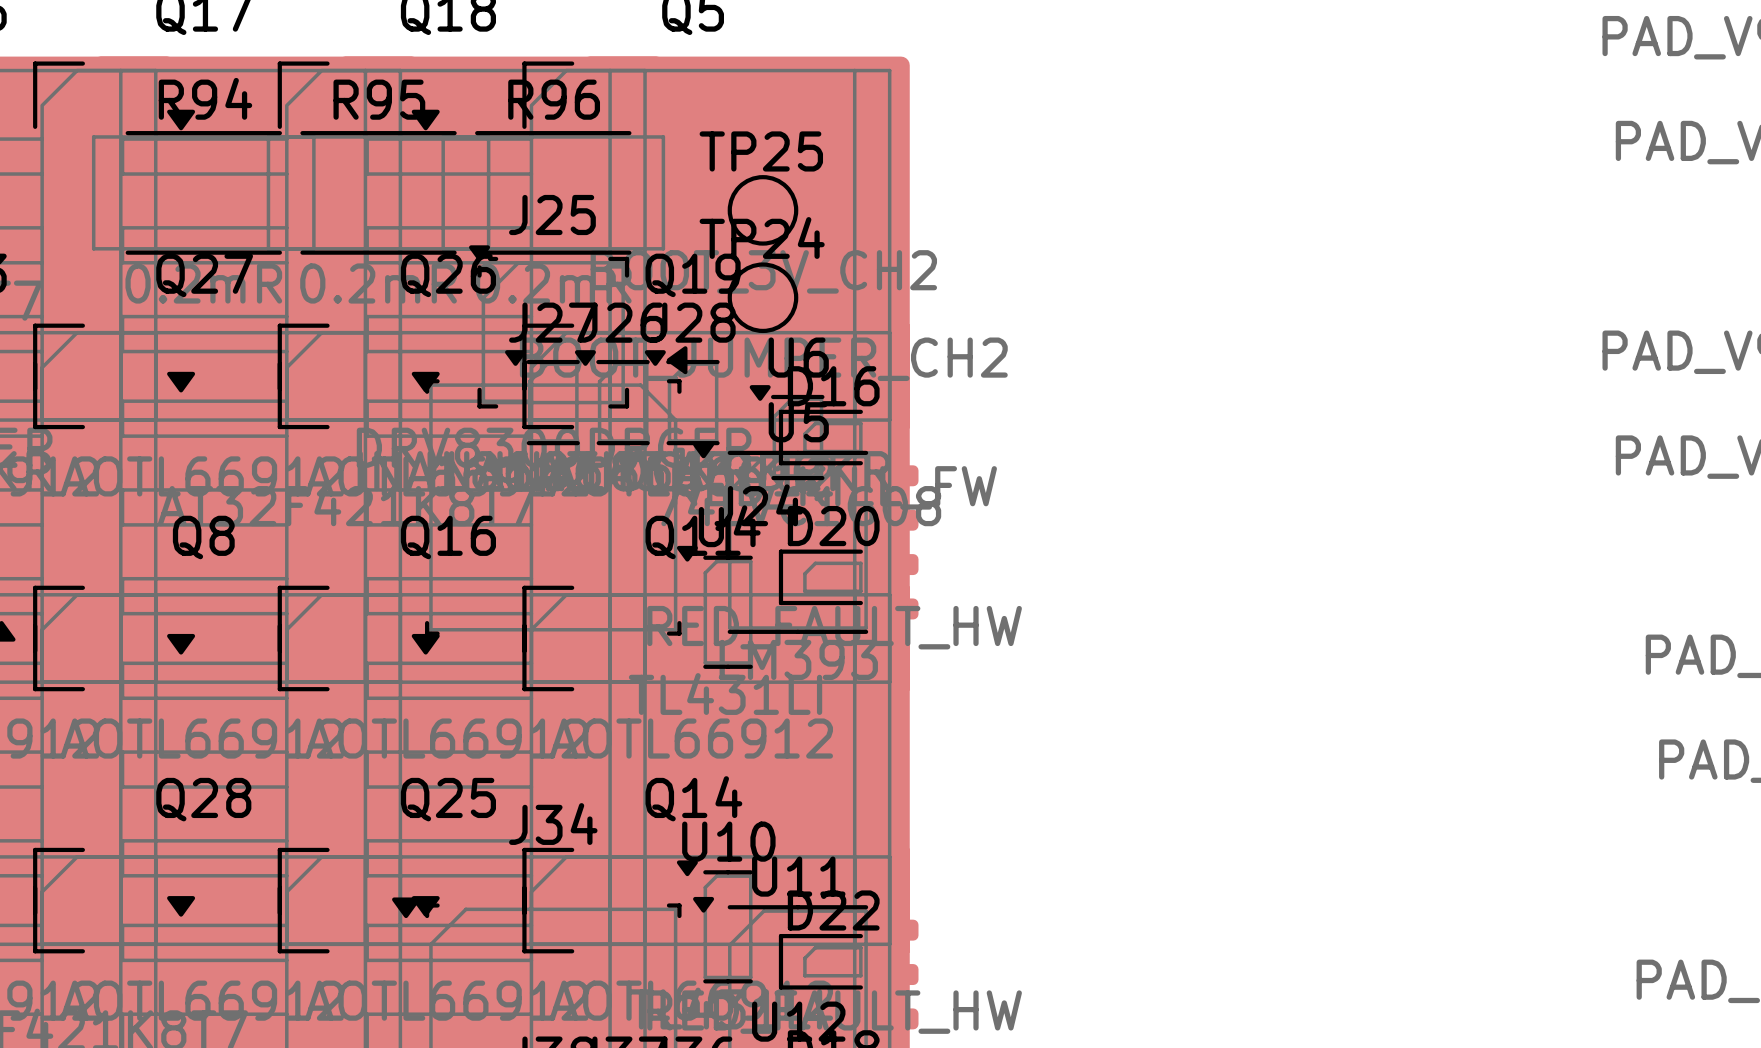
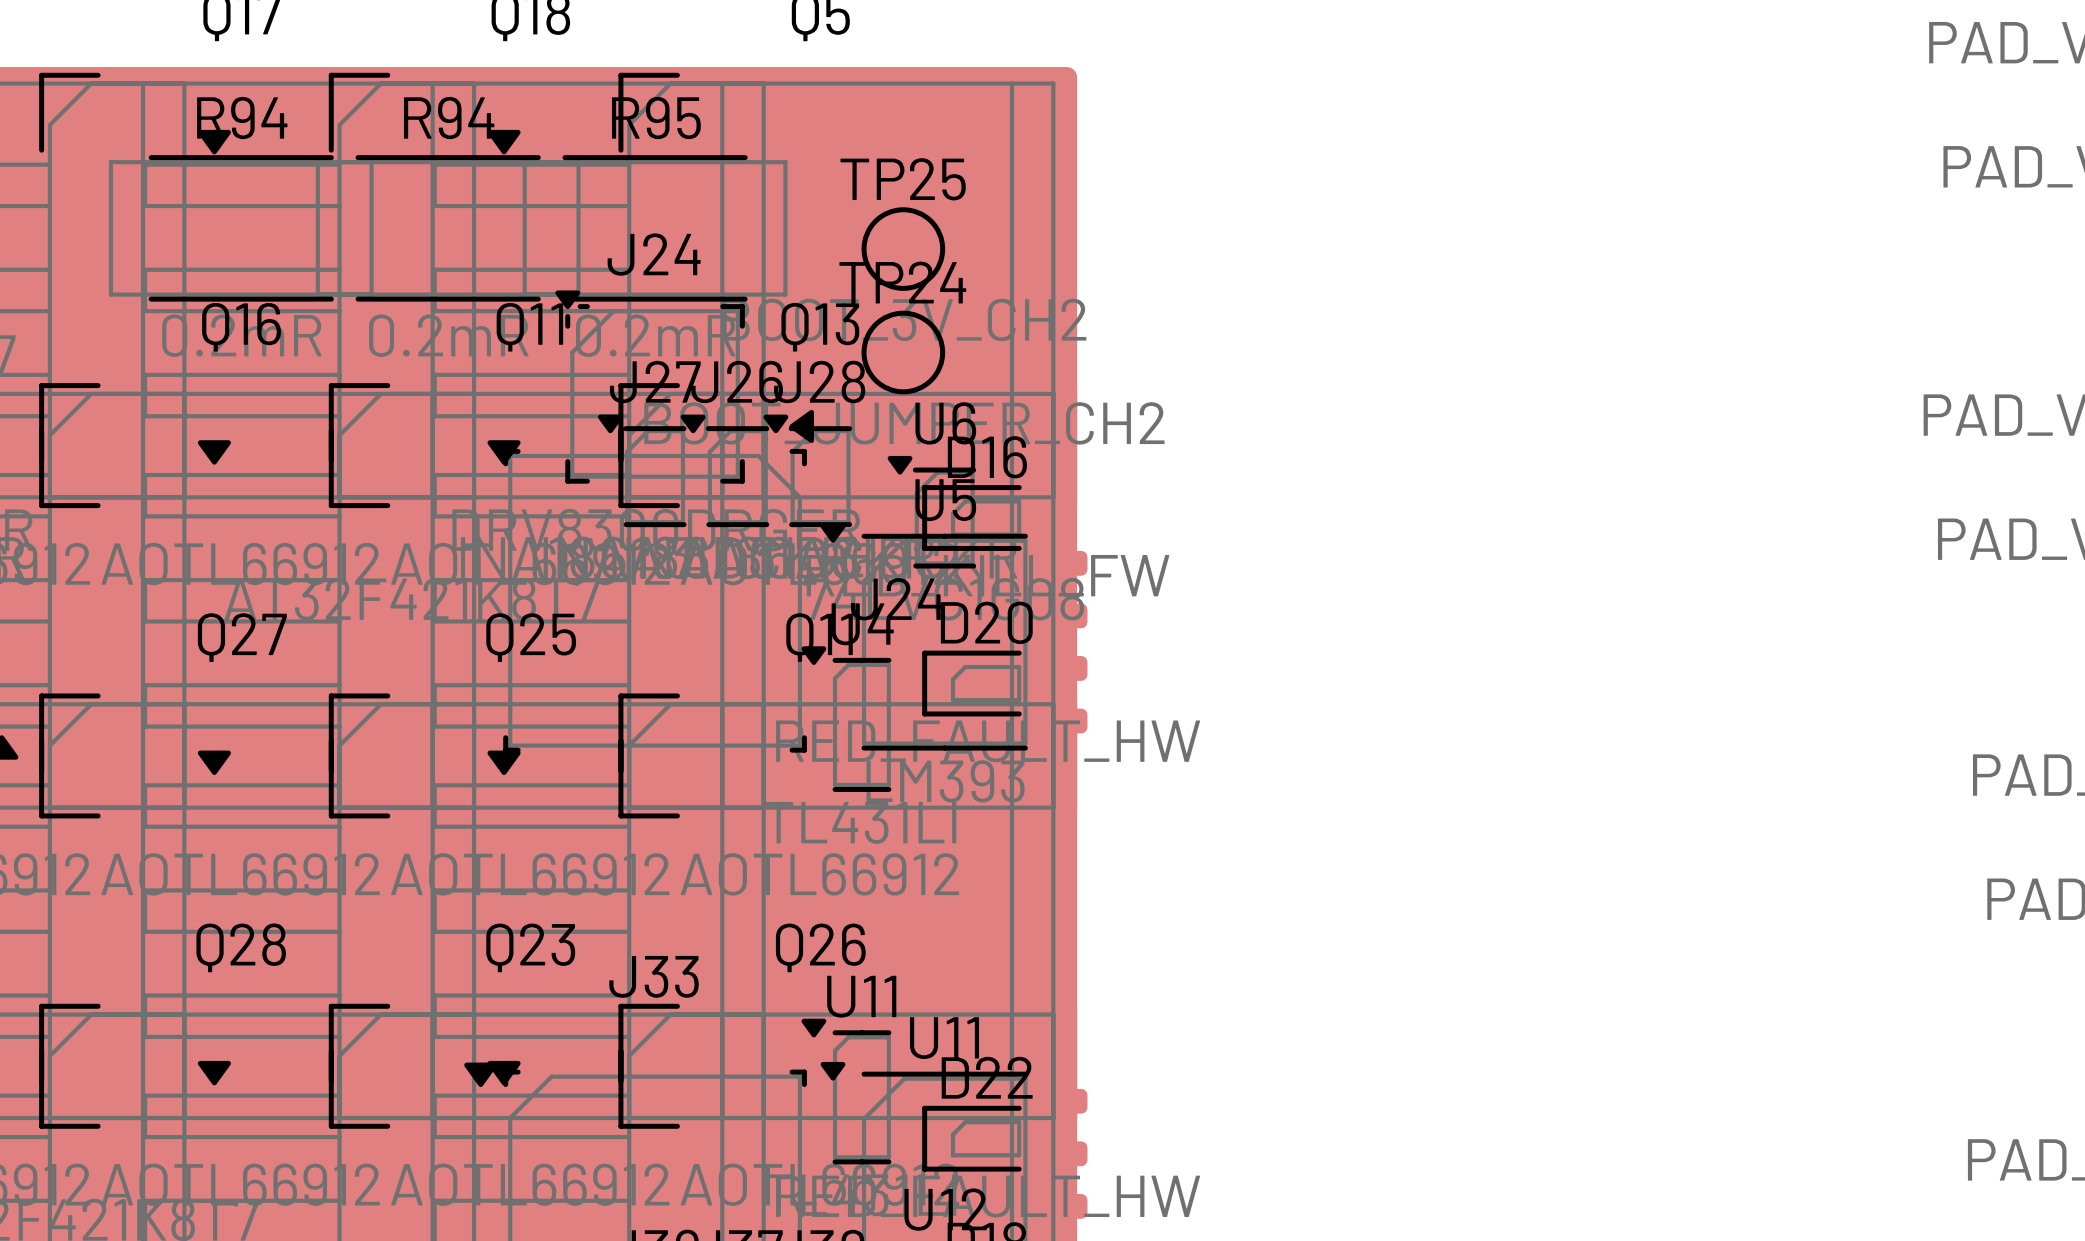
R95 name: R95 (379, 99) -> R94 (449, 118)
R96 name: R96 (554, 99) -> R95 (656, 118)
J25 name: J25 (552, 214) -> J24 (654, 254)
Q27 name: Q27 (204, 275) -> Q16 (241, 327)
Q26 name: Q26 (448, 275) -> Q11 (529, 327)
Q19 name: Q19 (693, 275) -> Q13 (820, 327)
Q8 name: Q8 (203, 537) -> Q27 (242, 637)
Q16 name: Q16 (448, 537) -> Q25 (531, 637)
Q14 name: Q14 (693, 798) -> Q26 (820, 947)
Q25 name: Q25 (448, 799) -> Q23 (530, 947)
J34 name: J34 (553, 824) -> J33 (654, 976)
U10 name: U10 (728, 841) -> U11 (861, 996)

